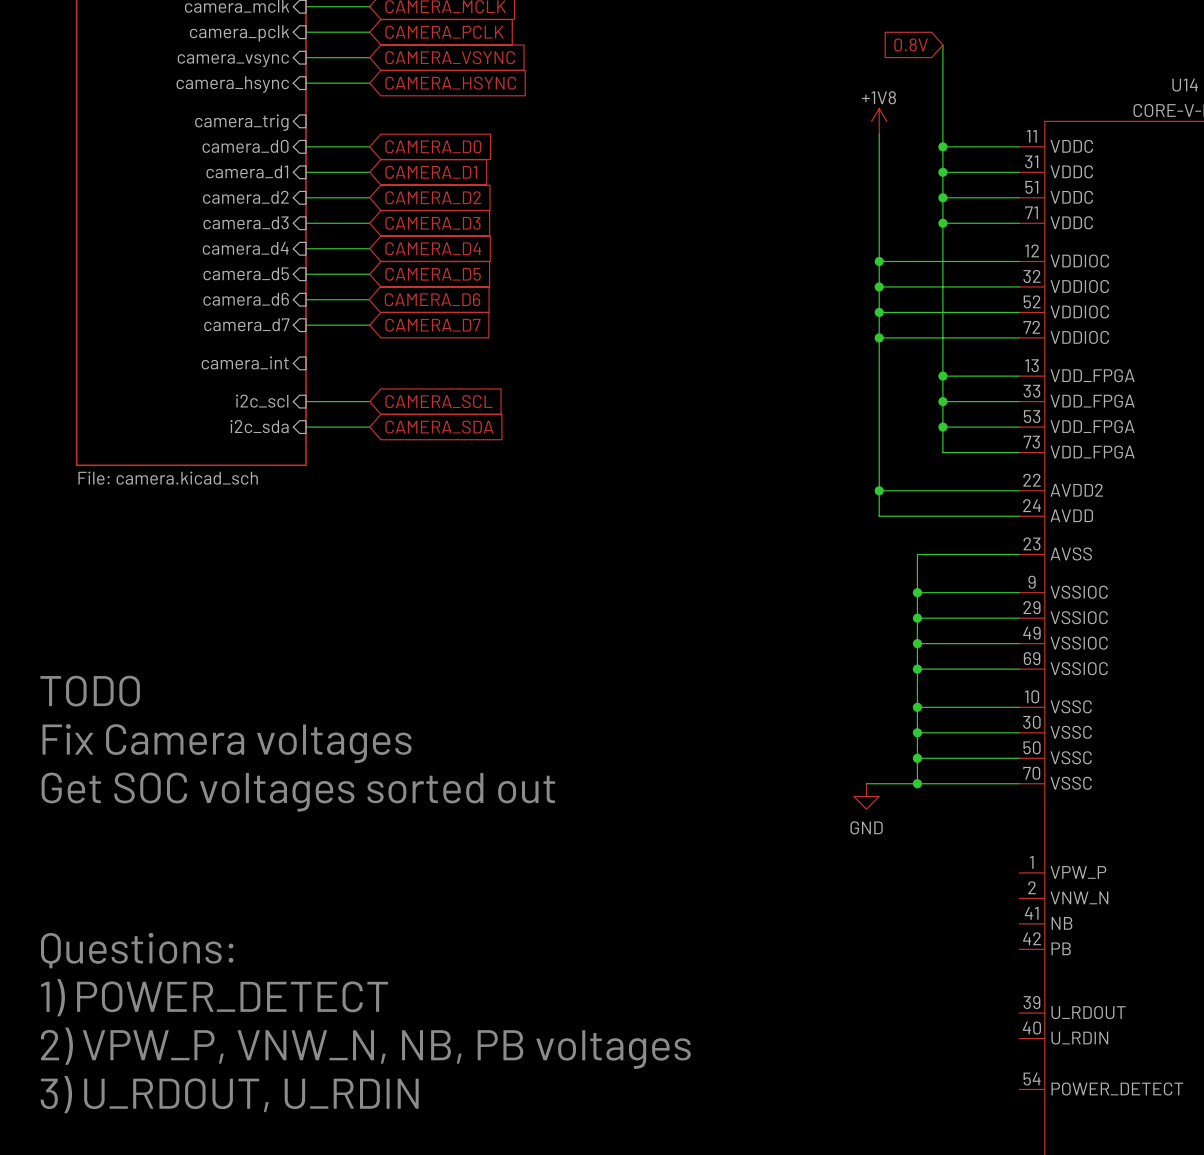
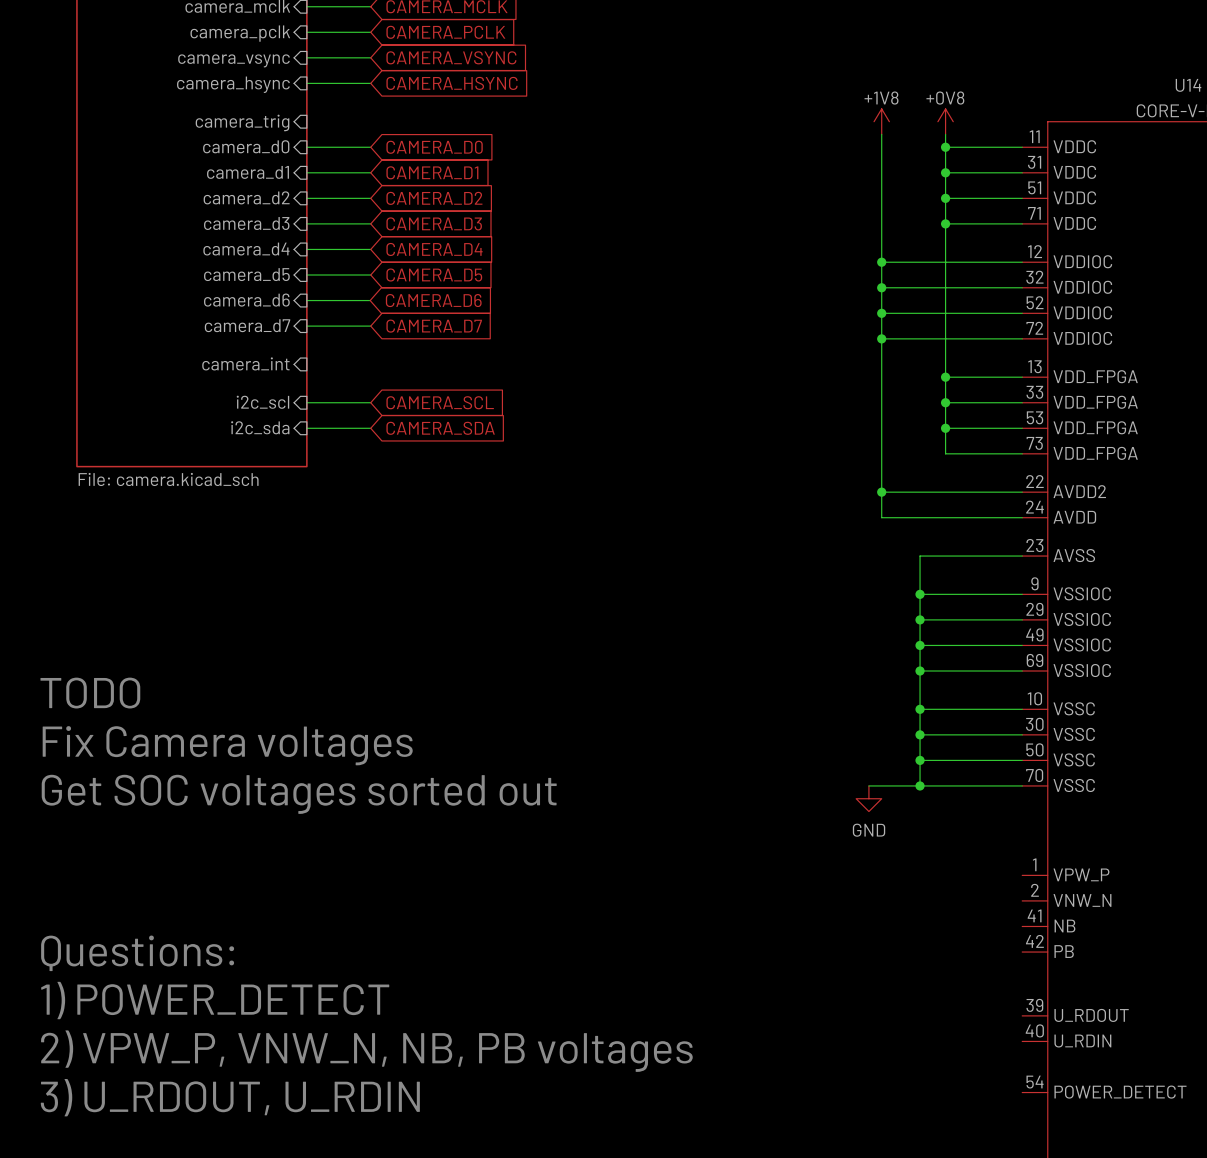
global label: 0.8V (911, 44) -> none
wire: (942, 44) (942, 134) -> none
power symbol: none -> +0V8 (945, 121)

